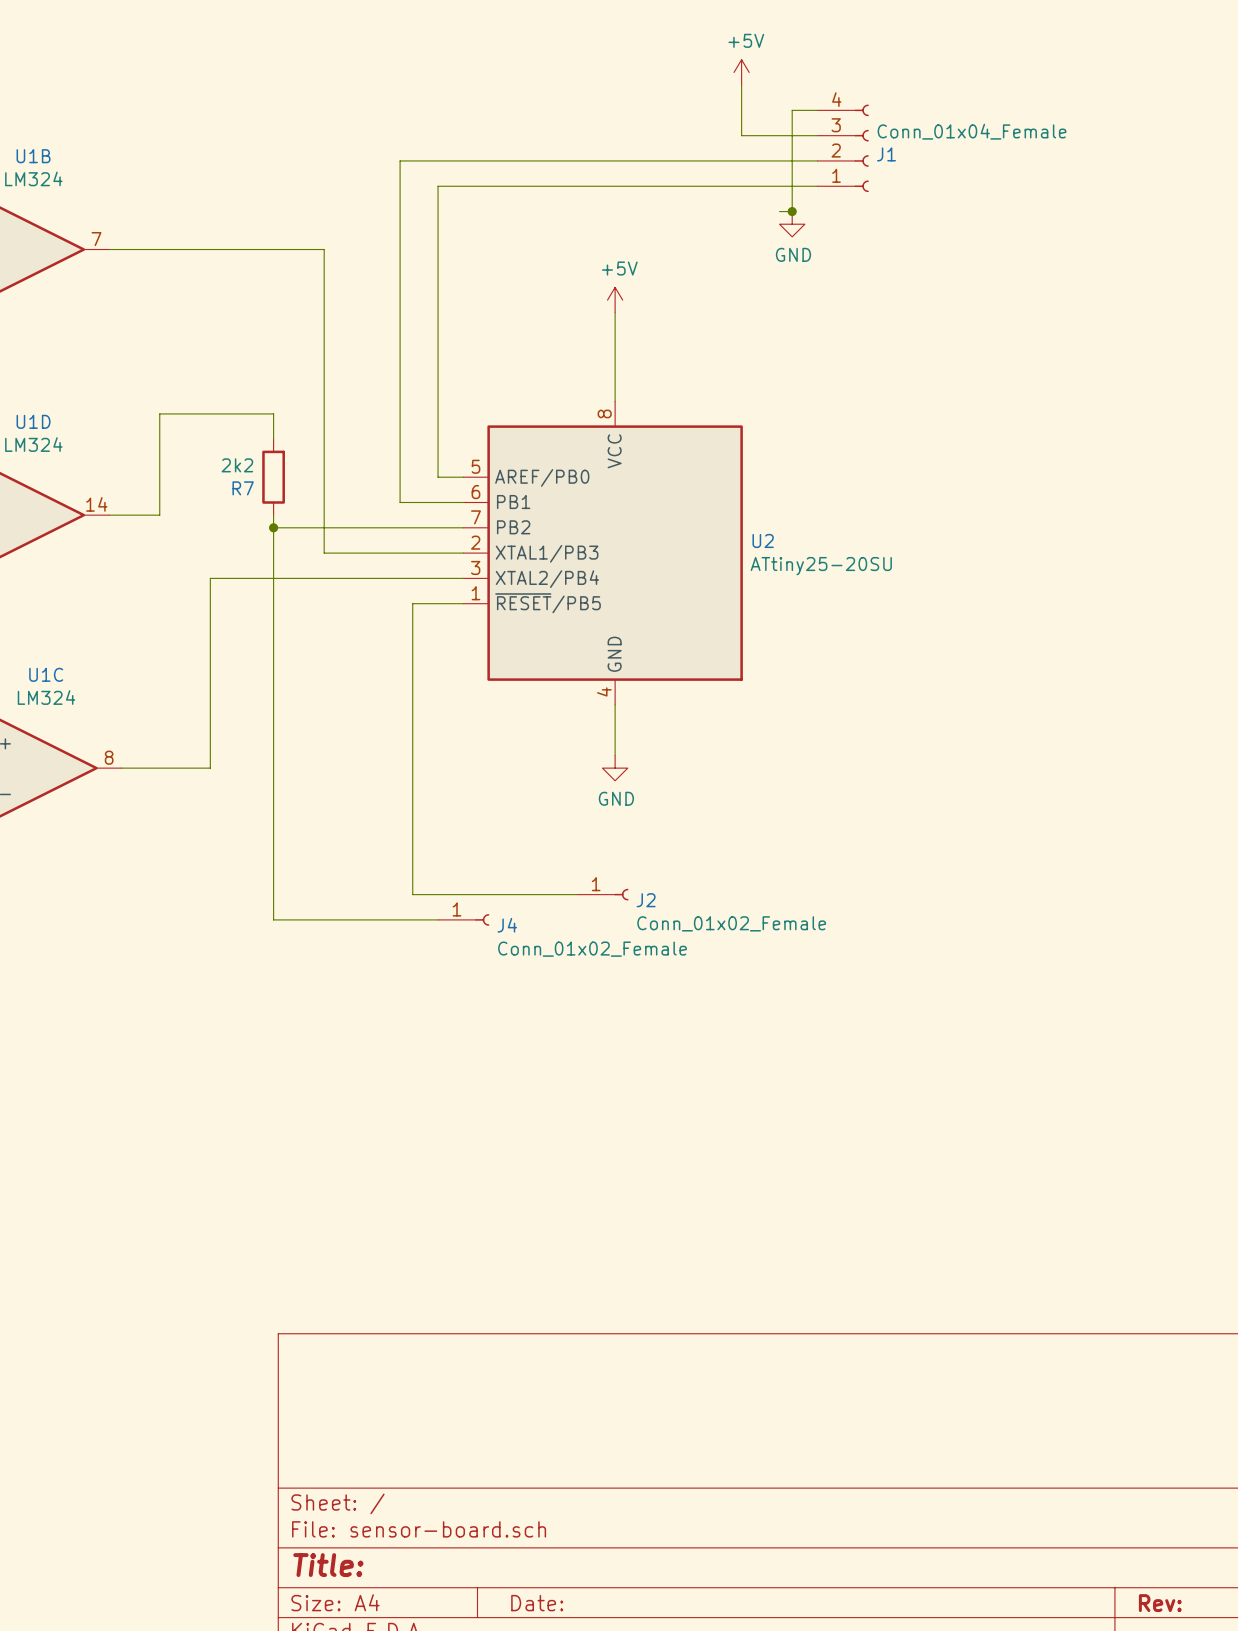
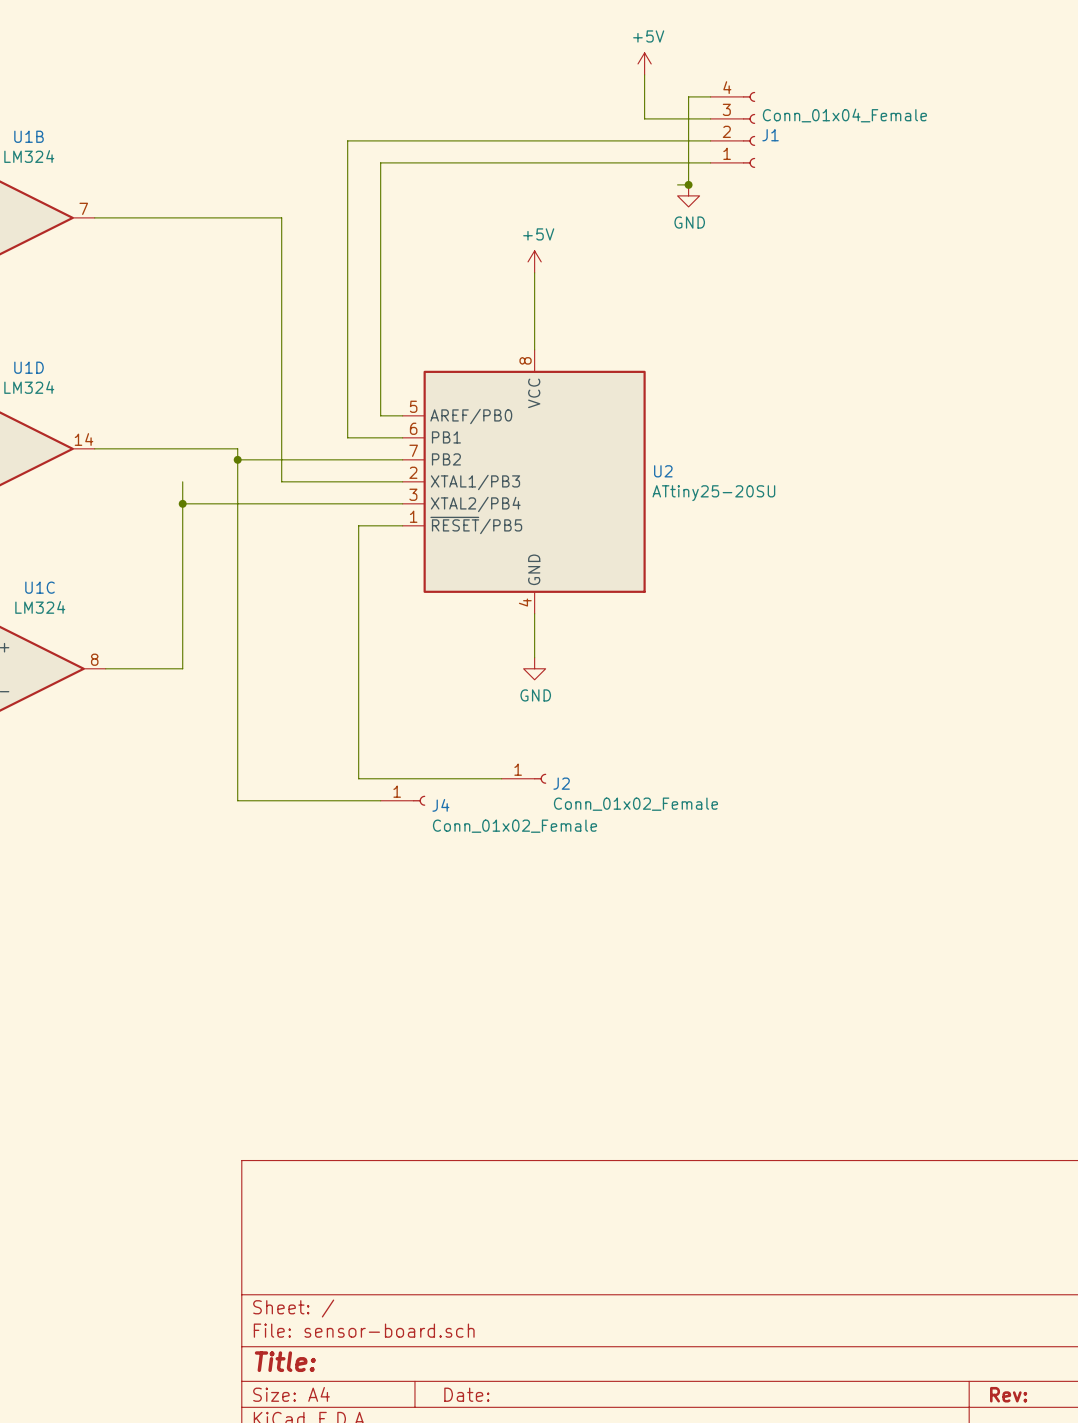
wire: (273, 439) (273, 413) (159, 413) (159, 515) -> (237, 448) (138, 448)
R7: 2k2 (273, 477) -> none
wire: none -> (182, 481) (182, 503)
junction: none -> (182, 503)

